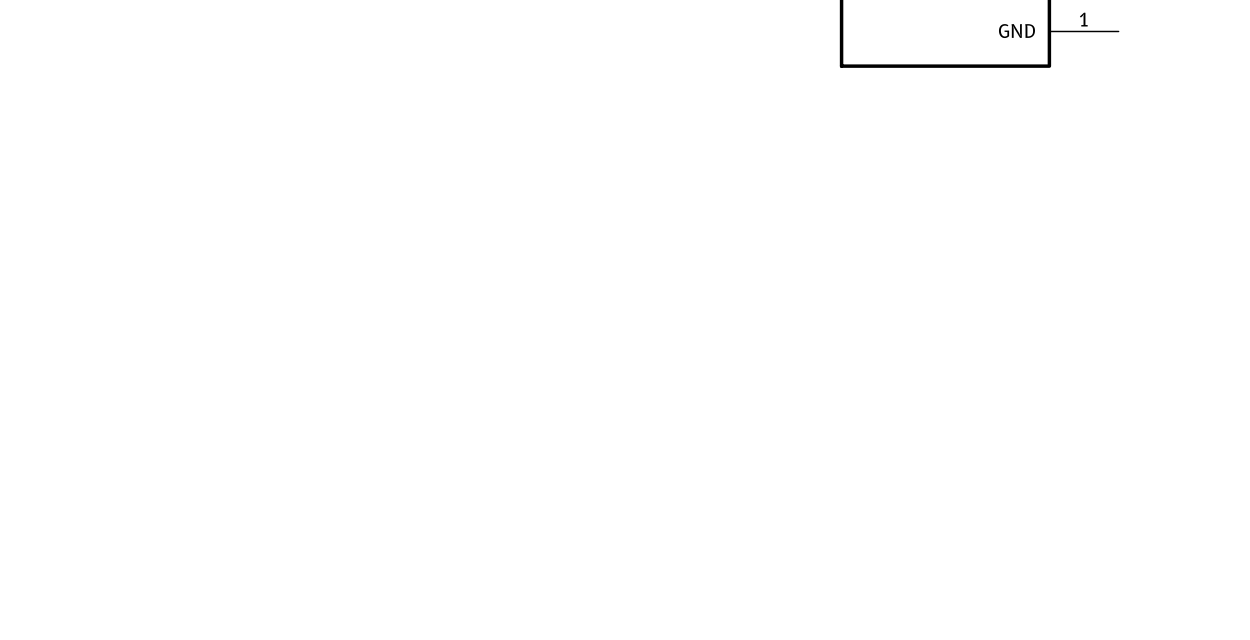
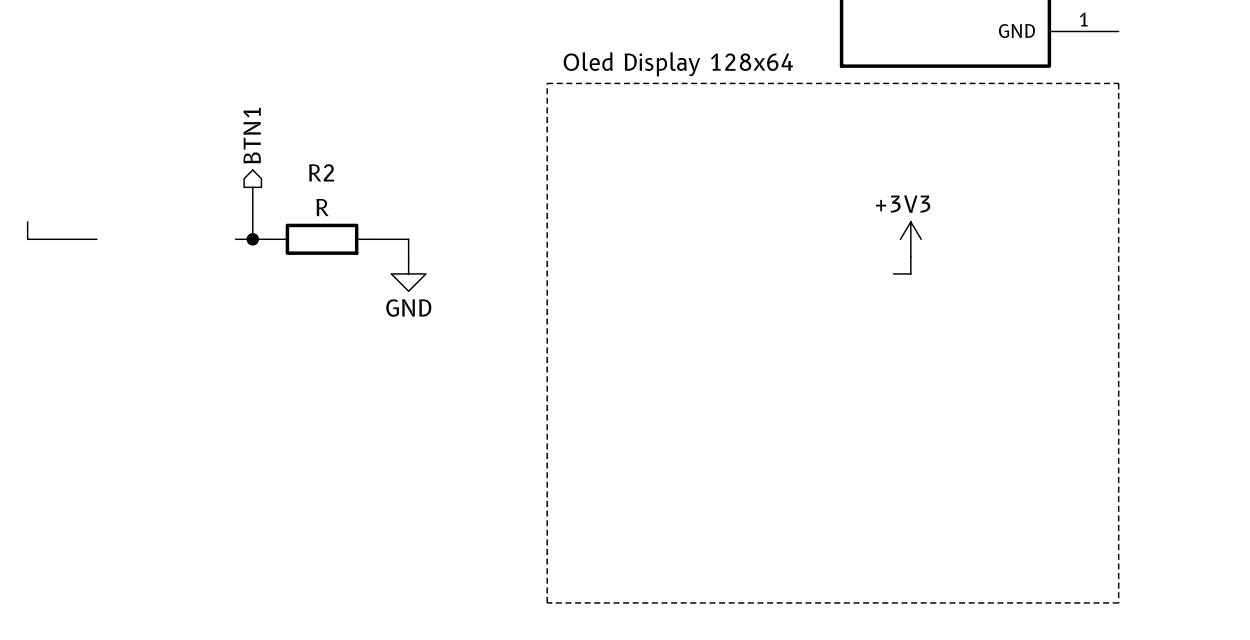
text: none -> Oled Display 128x64 (678, 64)
line: none -> (547, 83) (1118, 83) (1118, 602) (547, 602) (547, 83)
hierarchical label: none -> BTN1 (252, 135)
wire: none -> (252, 187) (252, 239)
wire: none -> (27, 221) (27, 239) (96, 239)
wire: none -> (235, 239) (270, 239)
junction: none -> (252, 239)
R2: none -> R (322, 239)
wire: none -> (373, 239) (408, 239) (408, 256)
power symbol: none -> +3V3 (910, 239)
wire: none -> (910, 256) (910, 273) (893, 273)
power symbol: none -> GND (408, 273)

